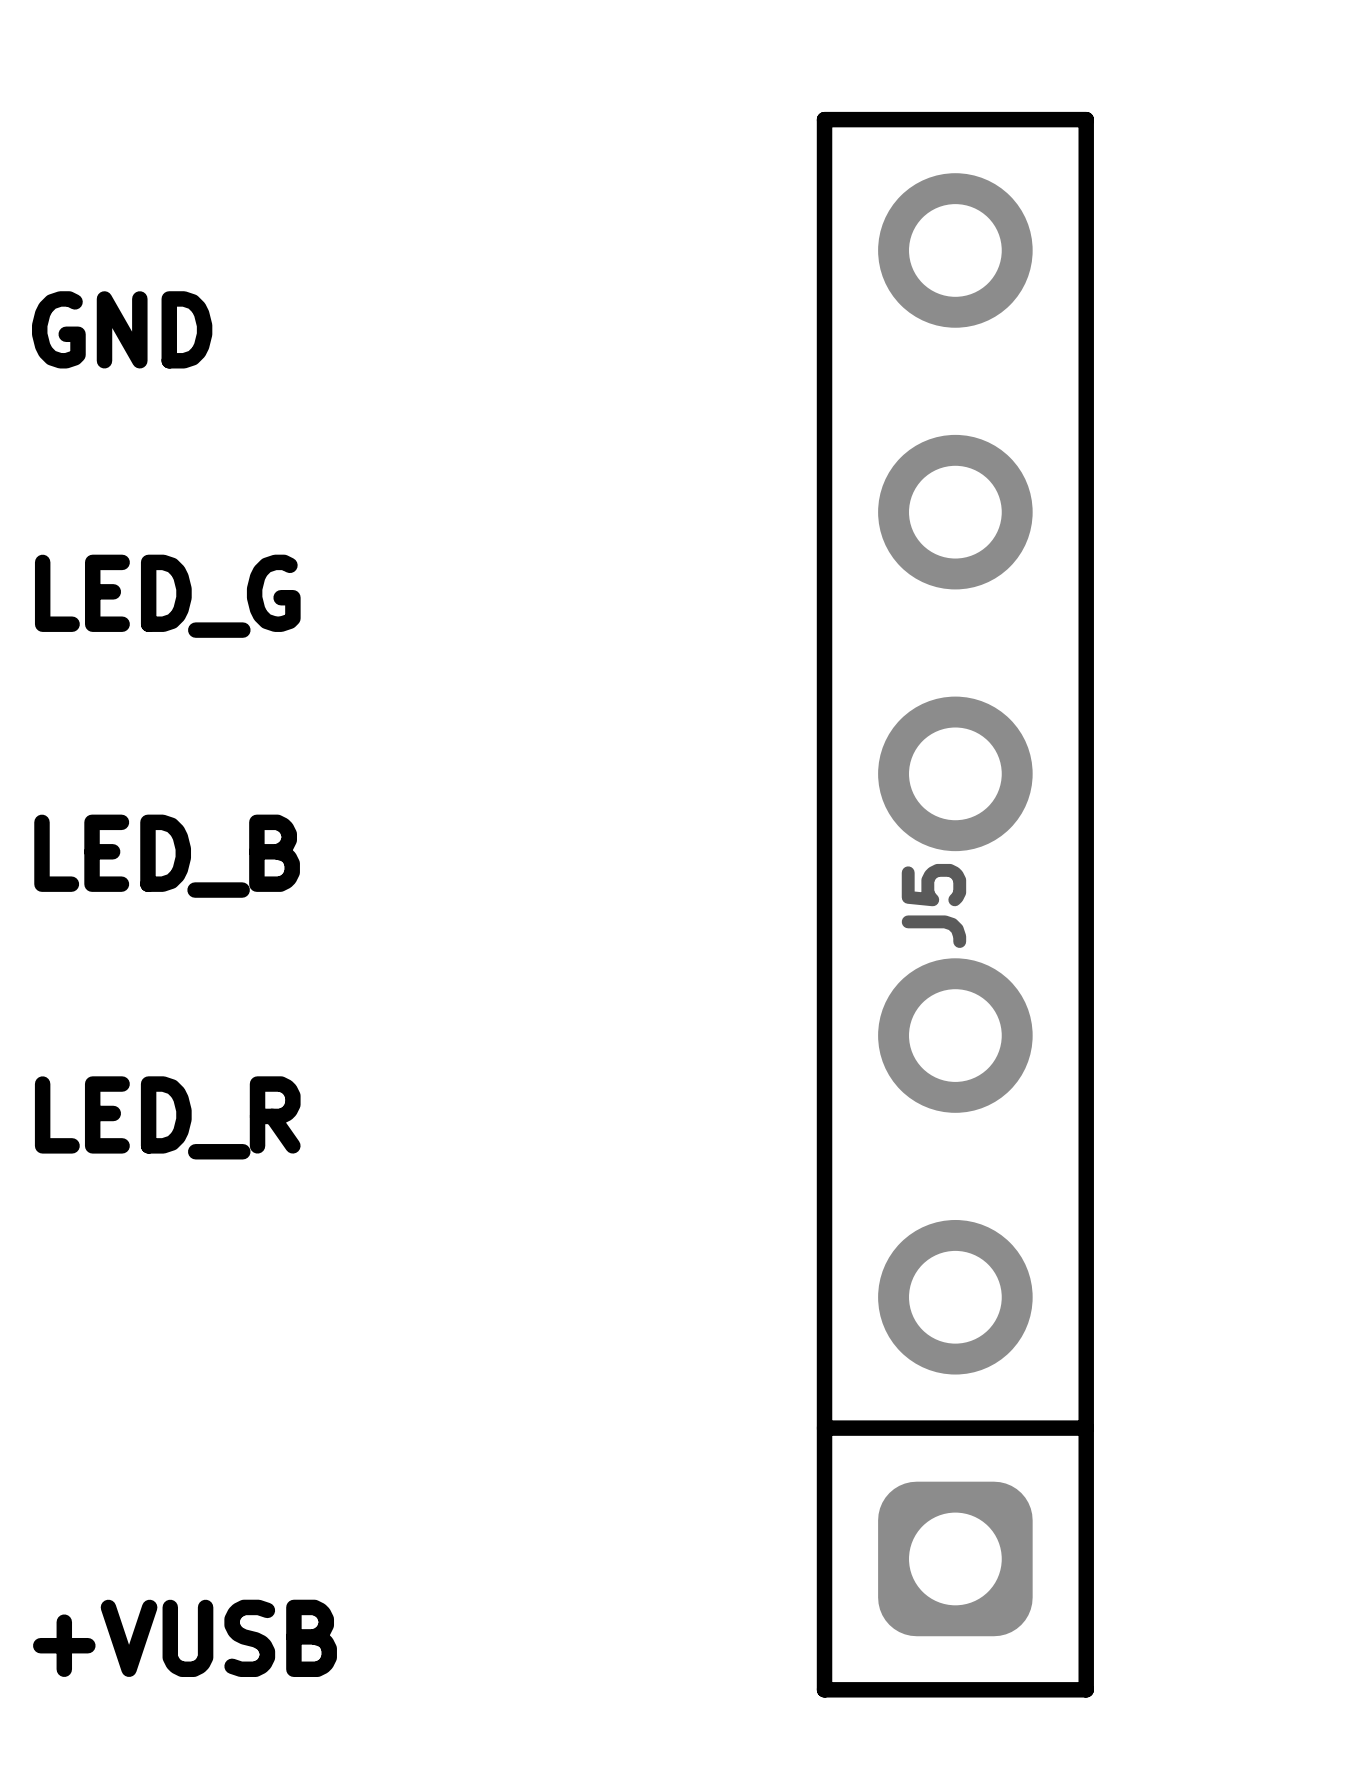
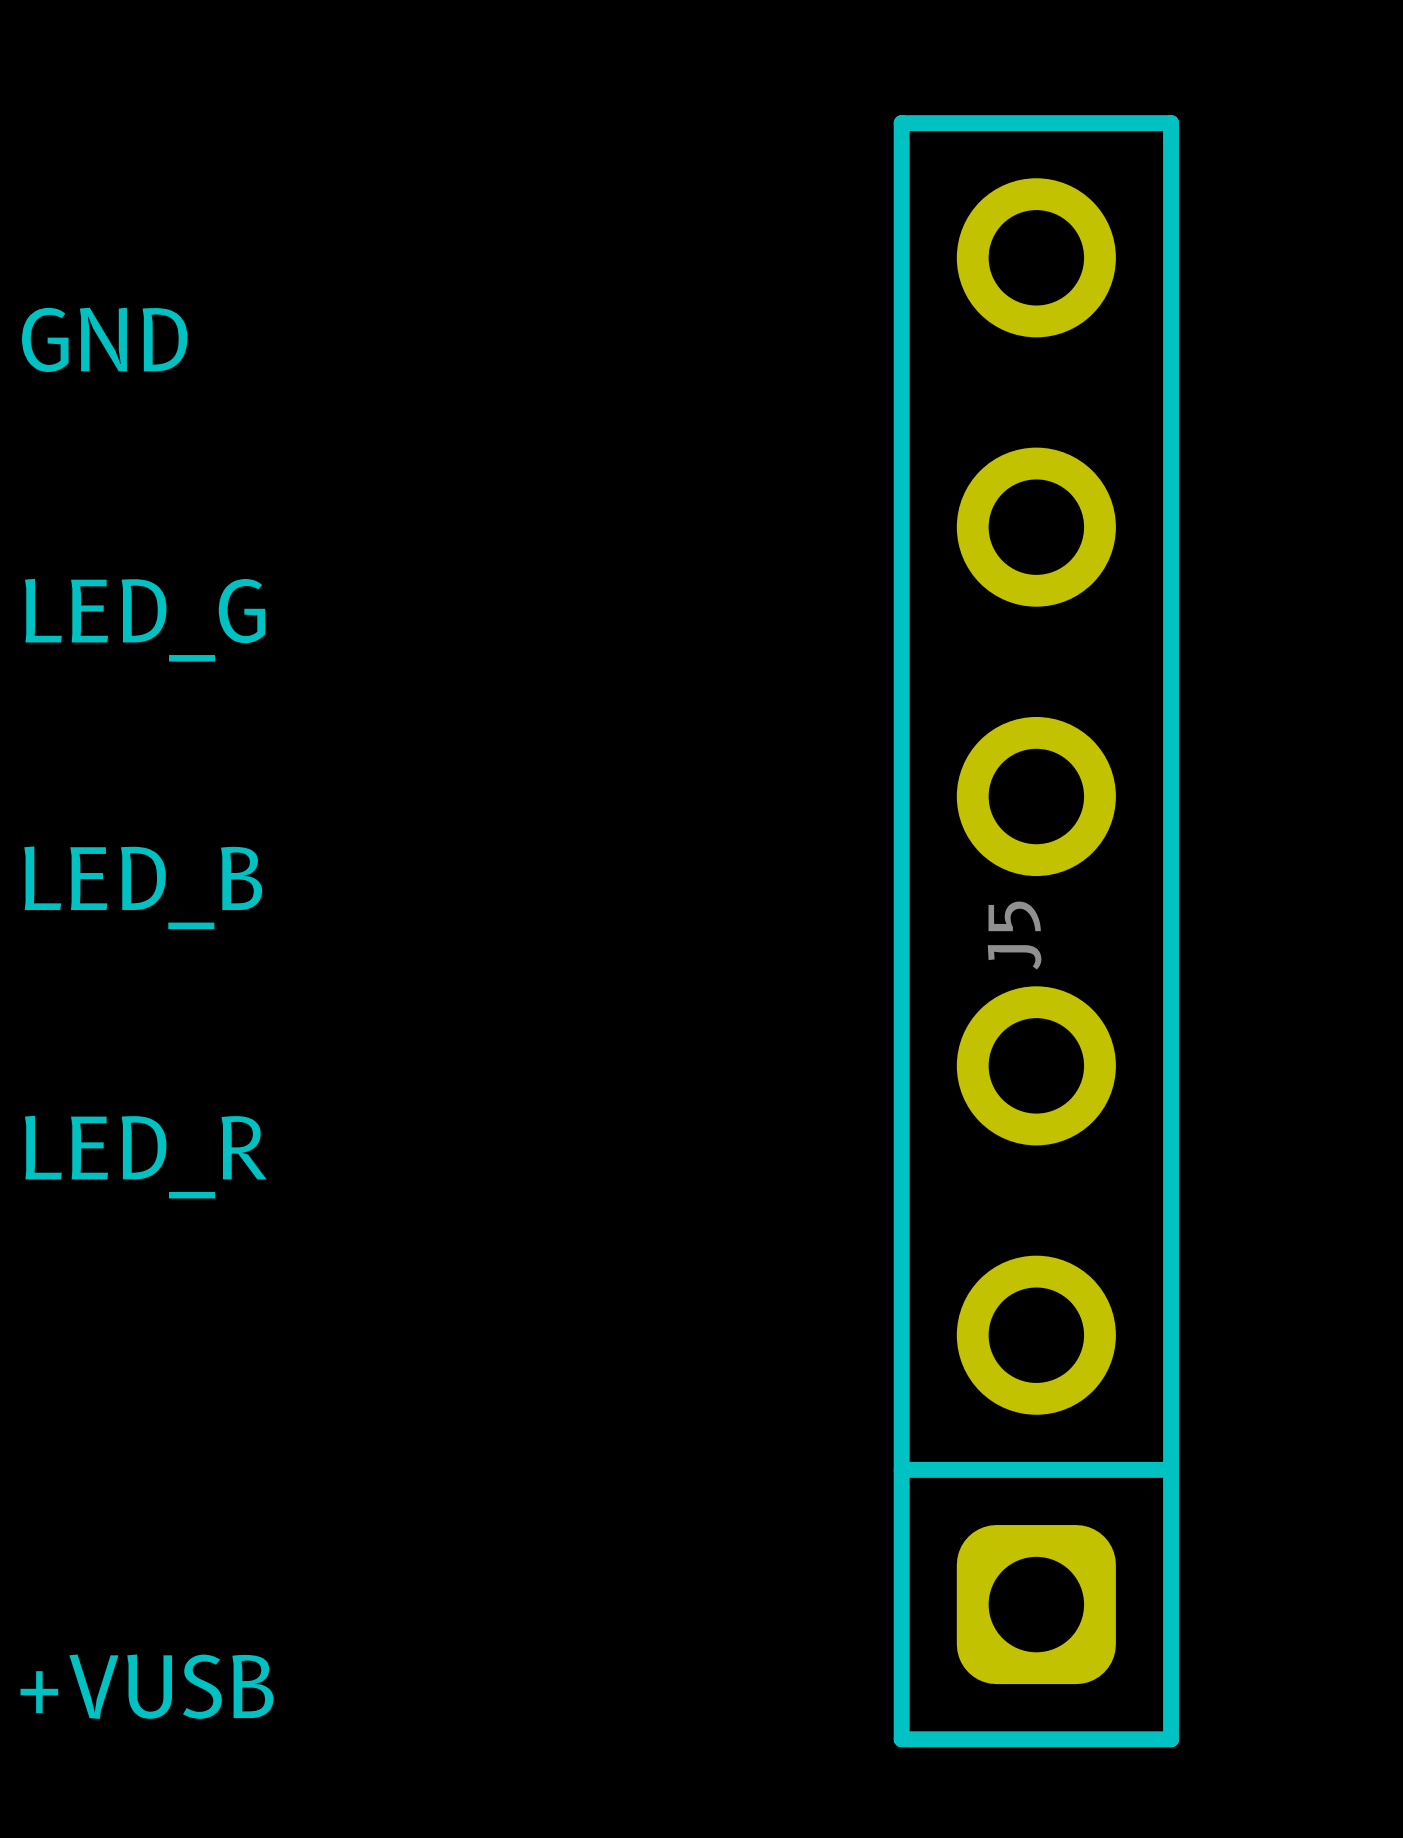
J5 position: (955, 904) -> (1036, 931)

